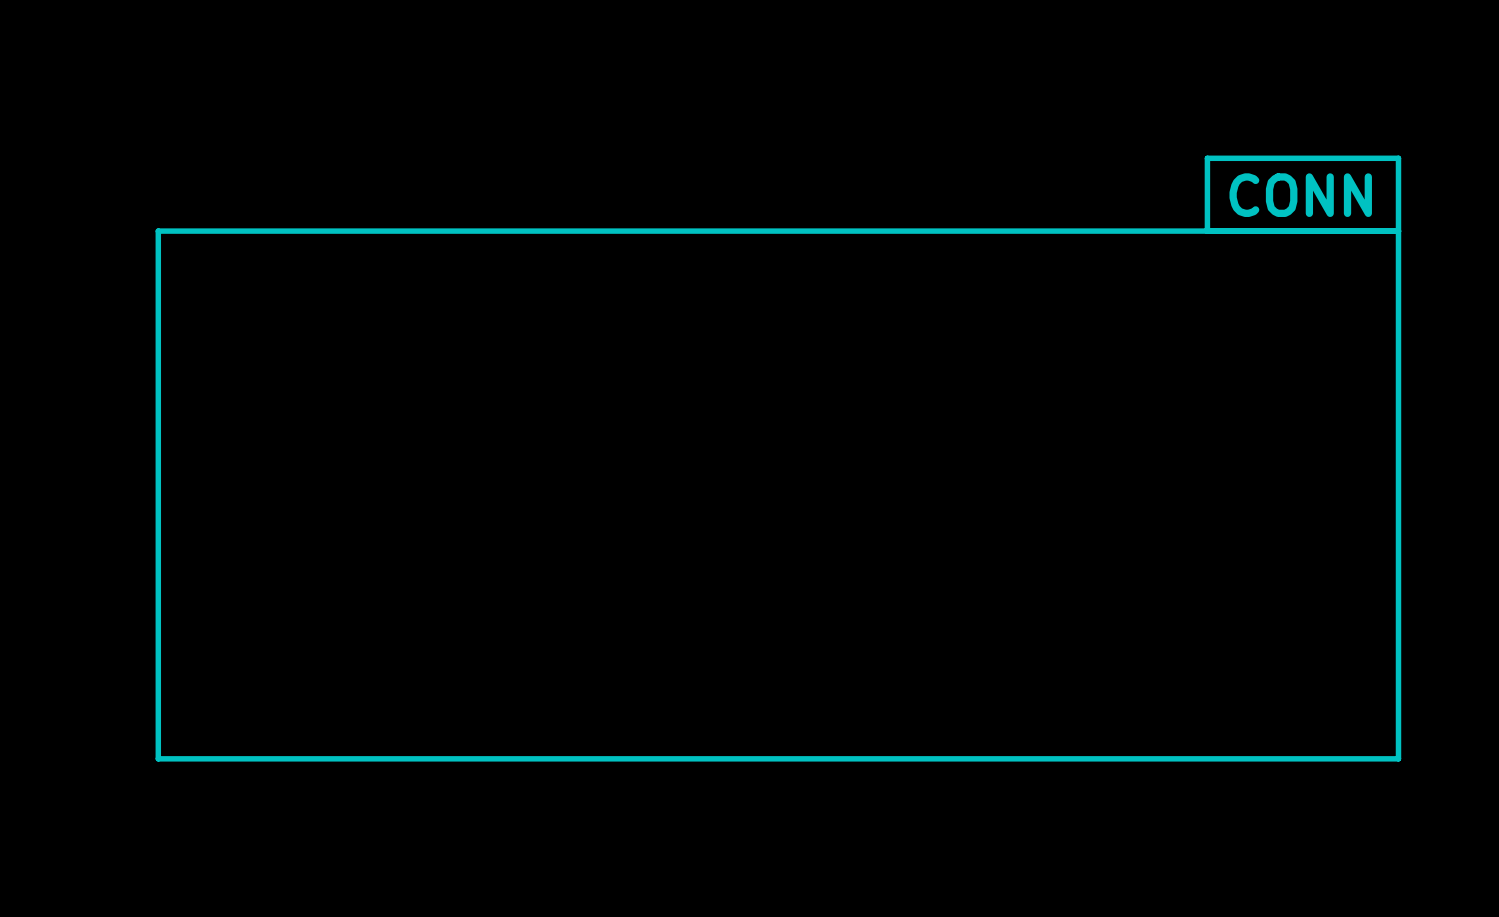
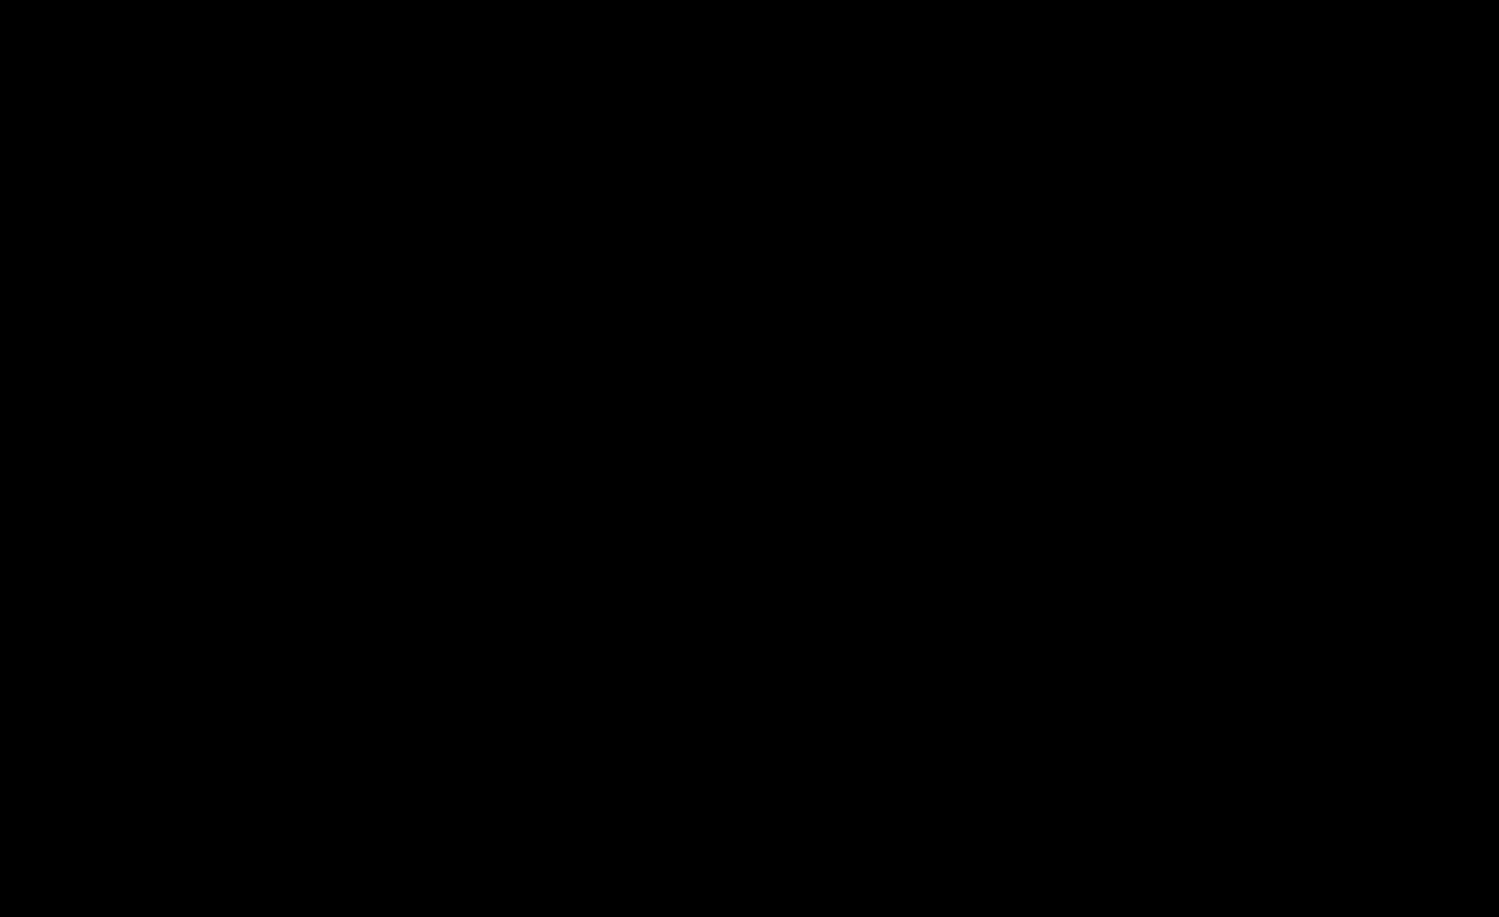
text: CONN (1300, 195) -> none
line: (1207, 231) (1207, 158) (1398, 158) (1398, 758) (158, 758) (158, 231) (1398, 231) -> none

